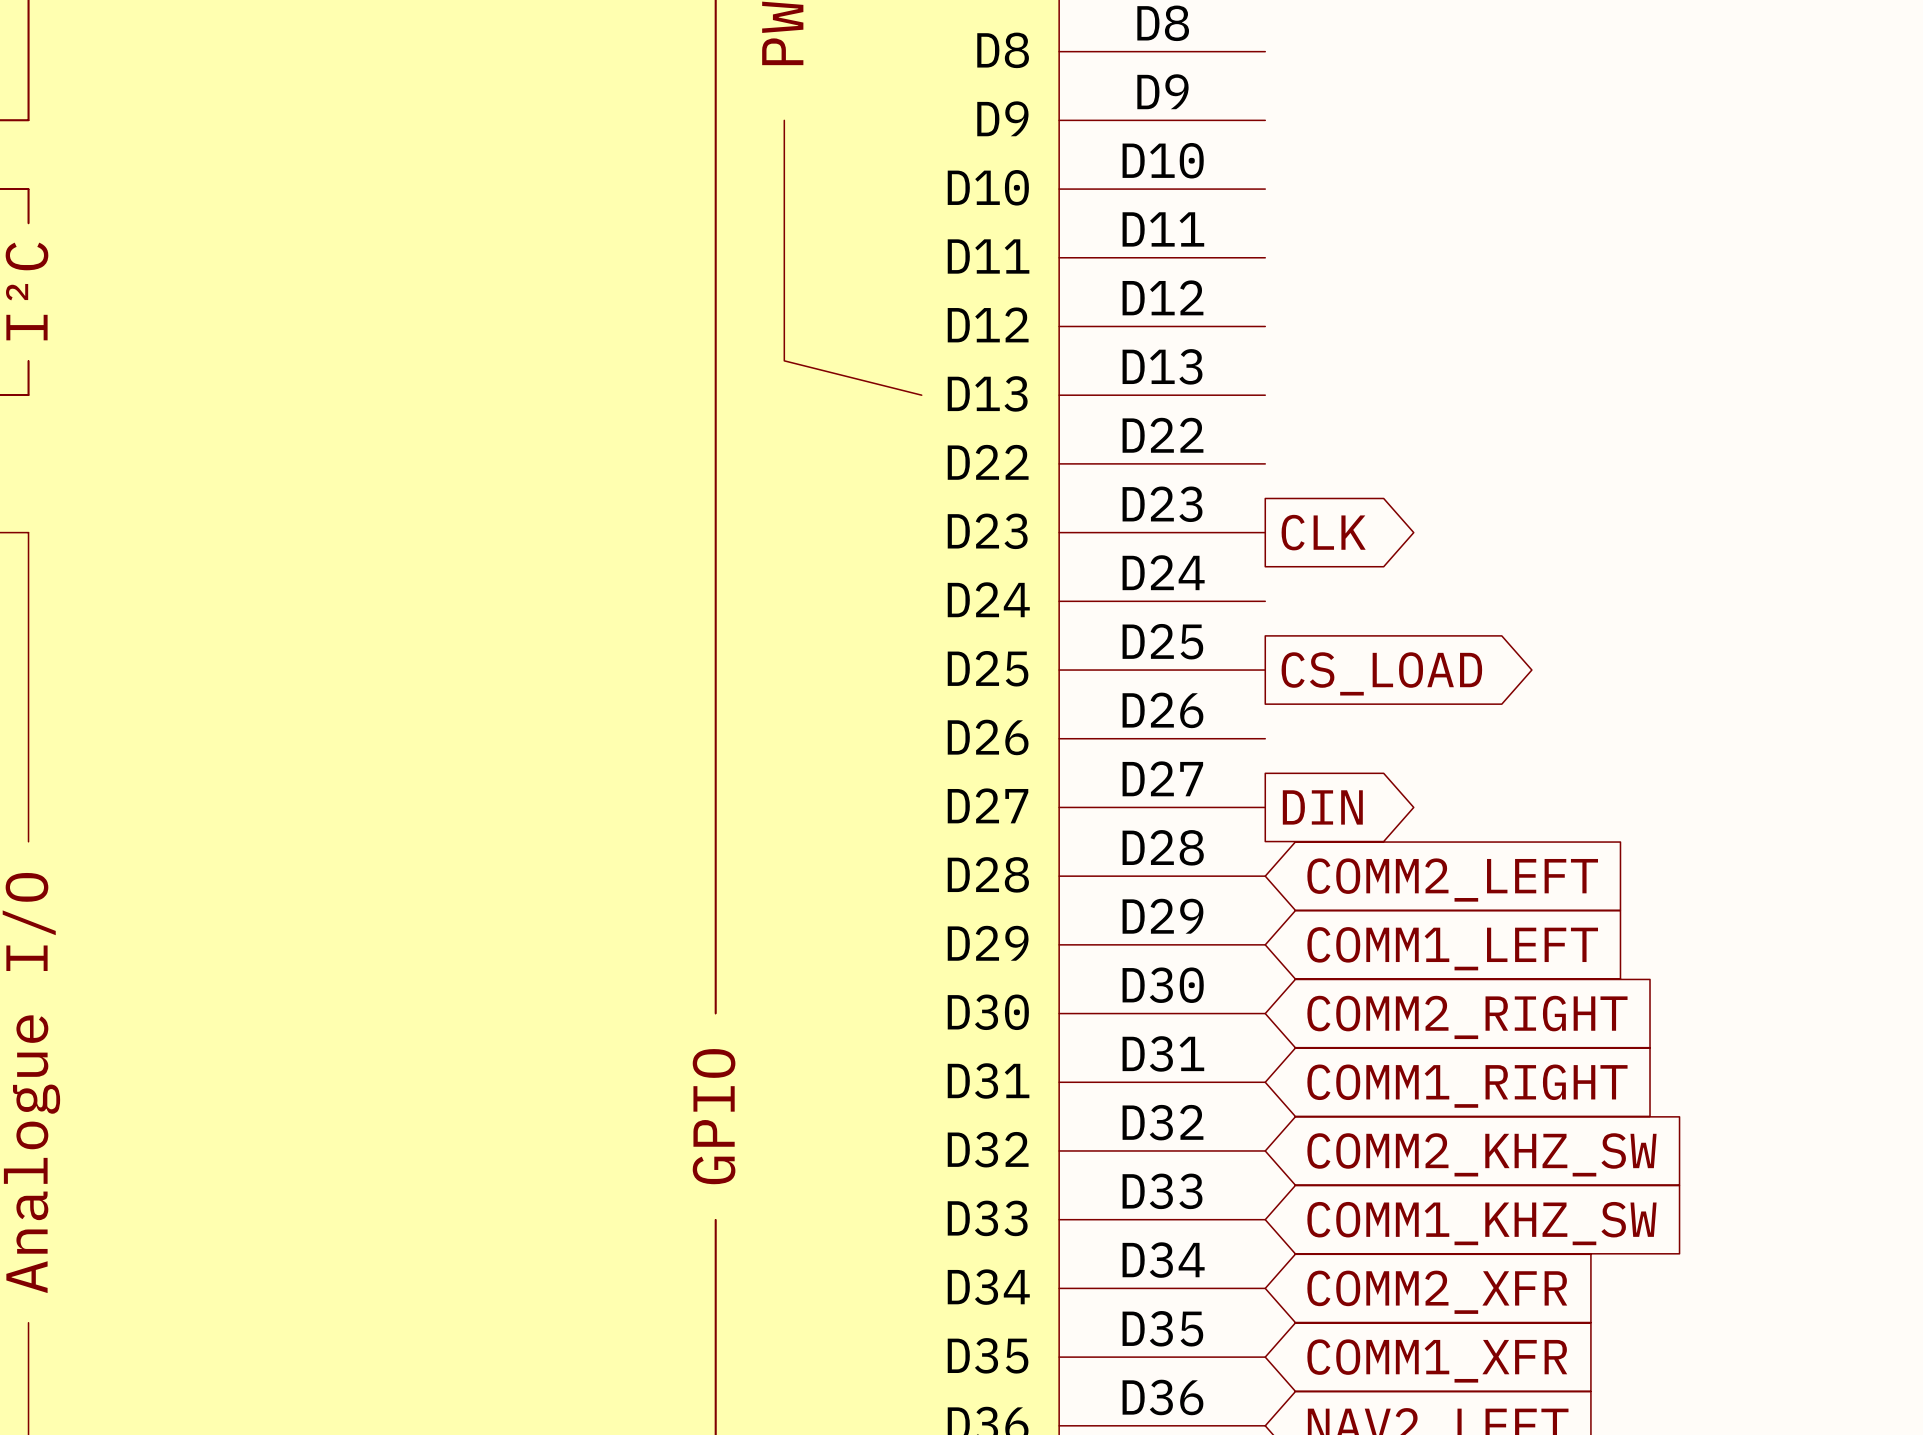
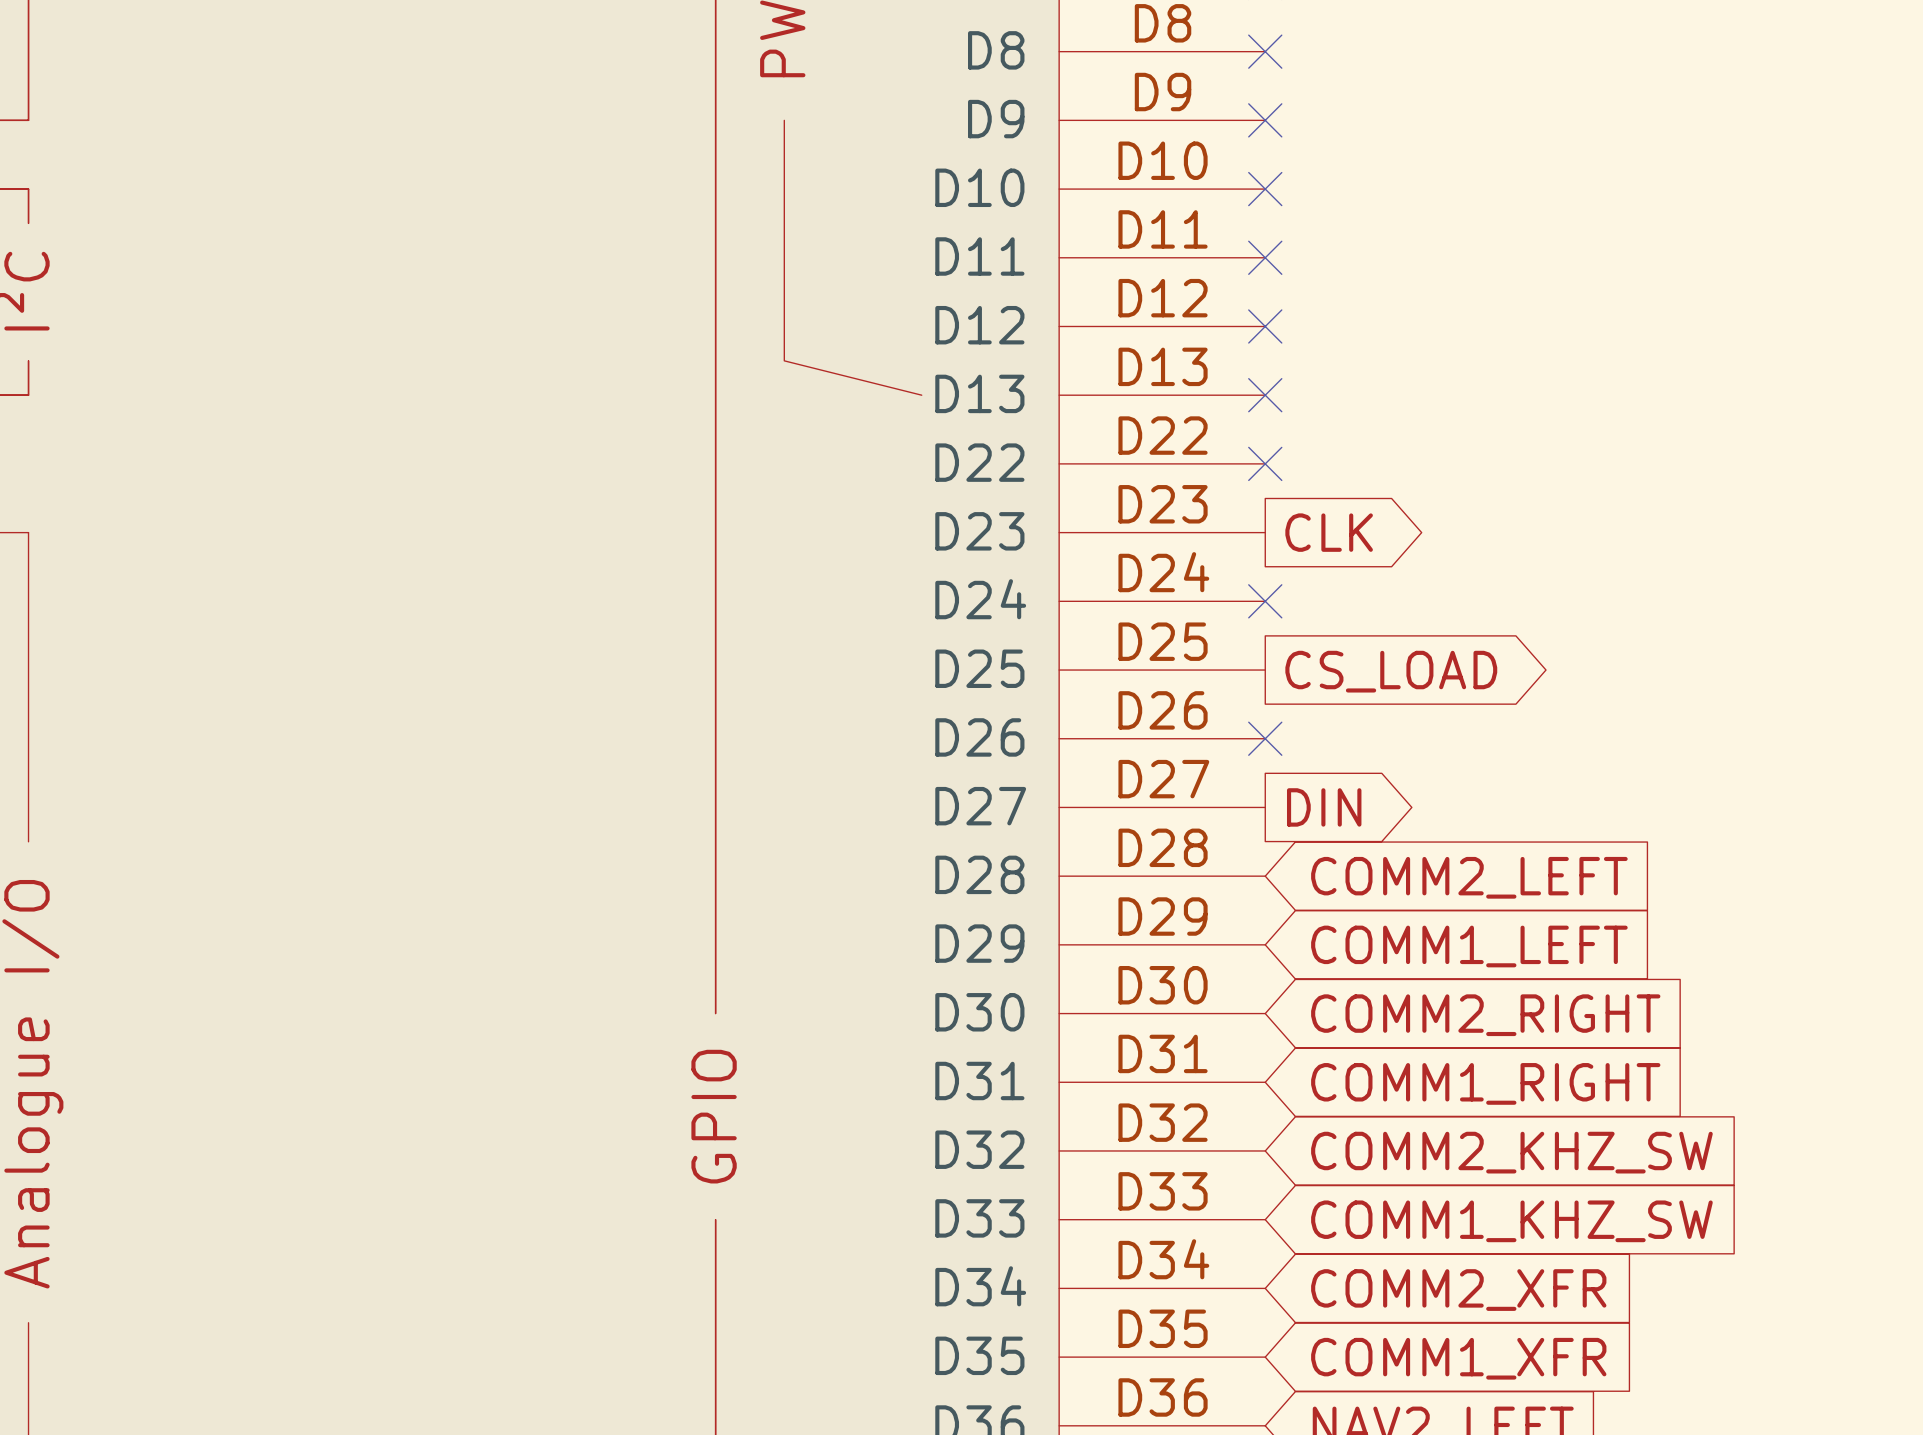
no-connect mark: none -> (1265, 51)
no-connect mark: none -> (1265, 120)
no-connect mark: none -> (1265, 189)
no-connect mark: none -> (1265, 257)
no-connect mark: none -> (1265, 326)
no-connect mark: none -> (1265, 395)
no-connect mark: none -> (1265, 463)
no-connect mark: none -> (1265, 601)
no-connect mark: none -> (1265, 738)

